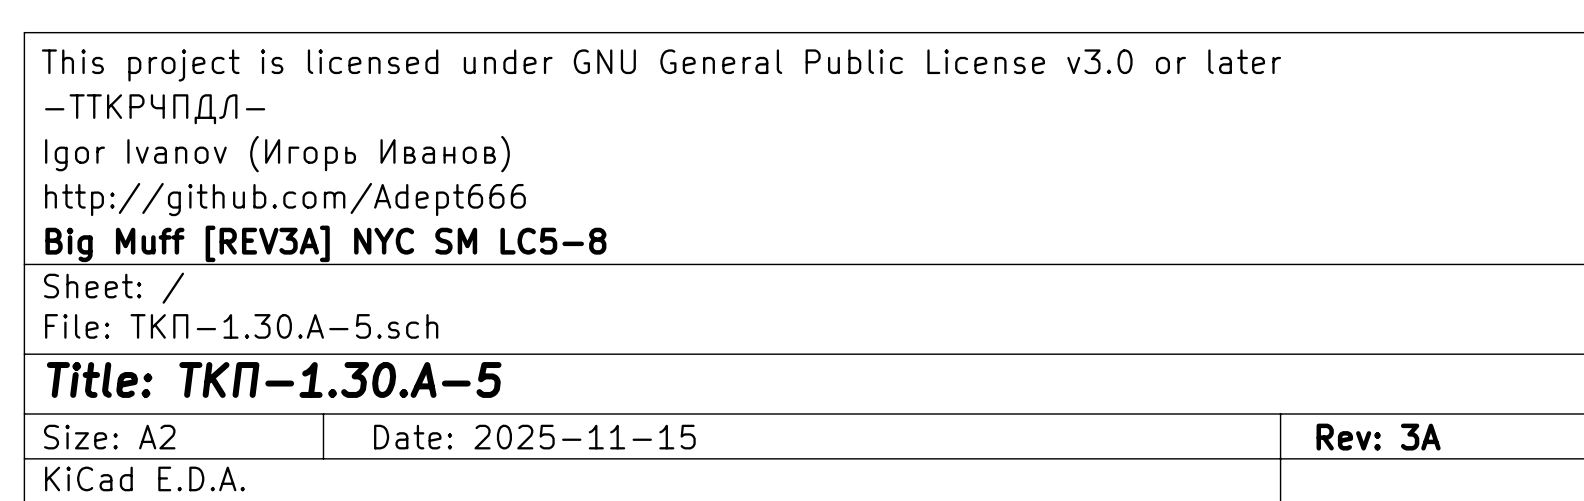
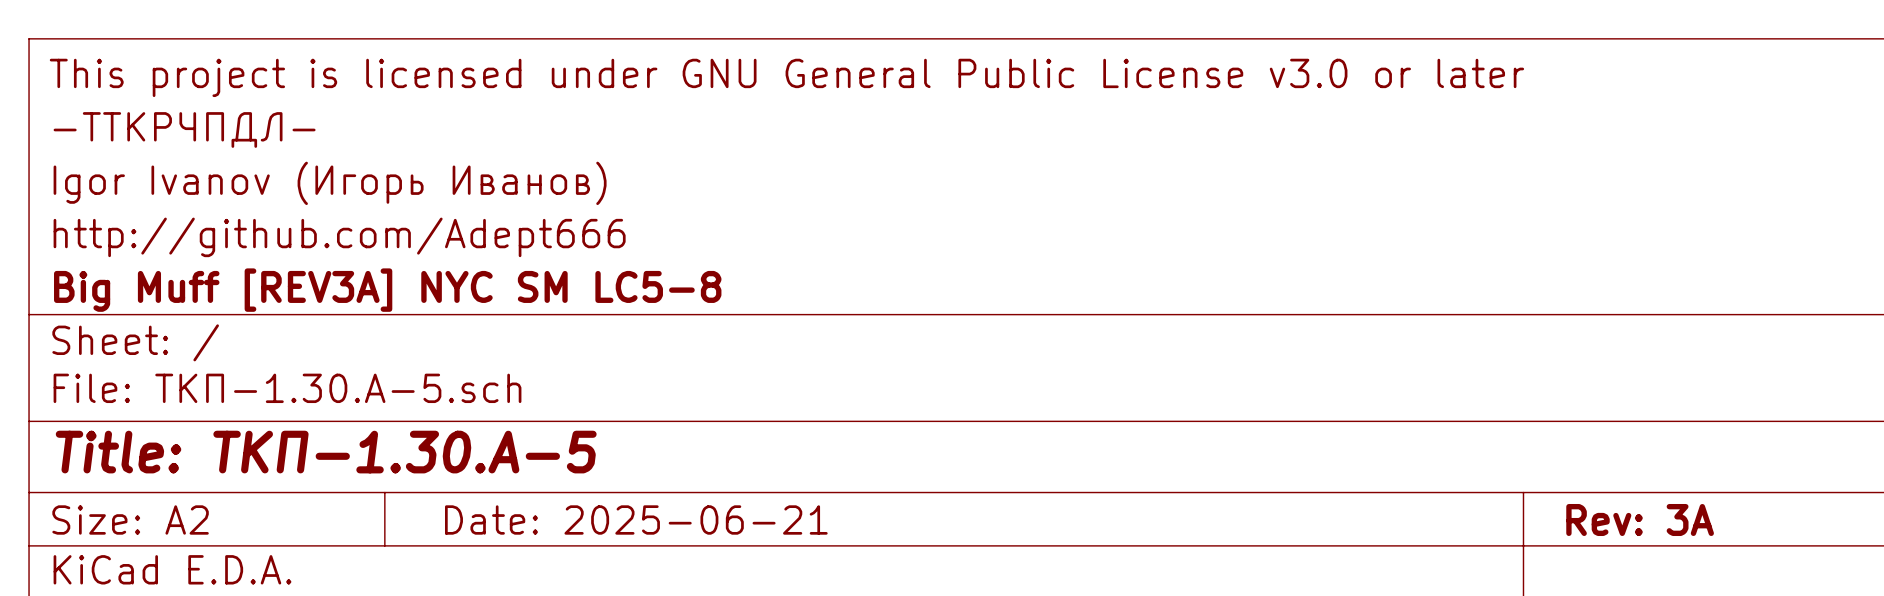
title block: Date: 2025-11-15 (534, 437) -> Date: 2025-06-21 (636, 520)

